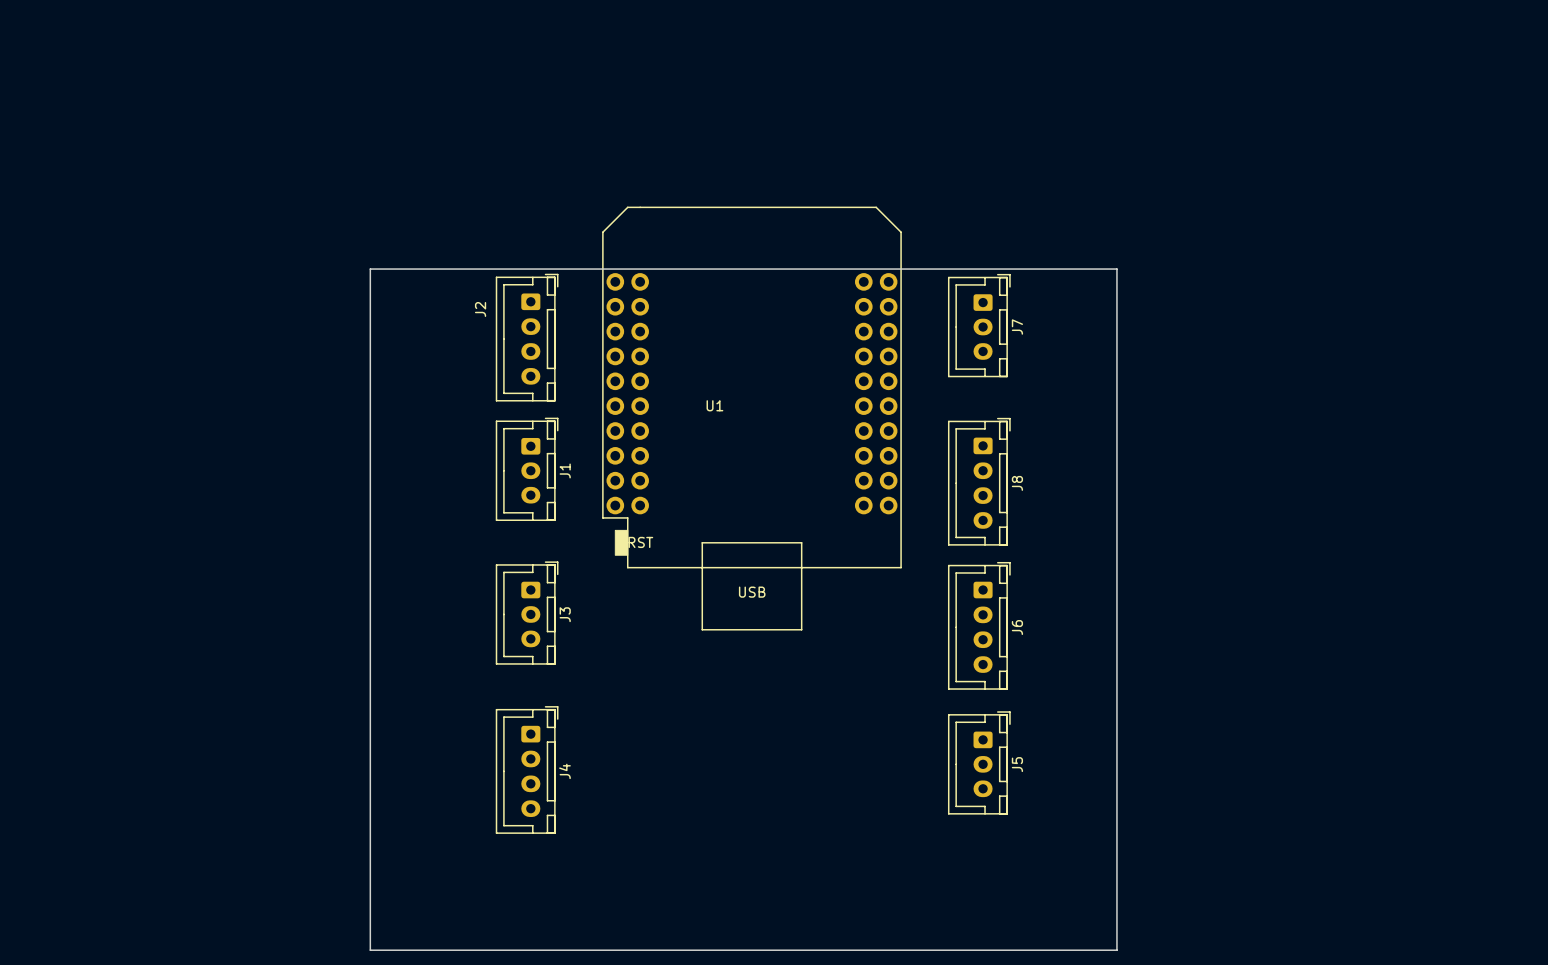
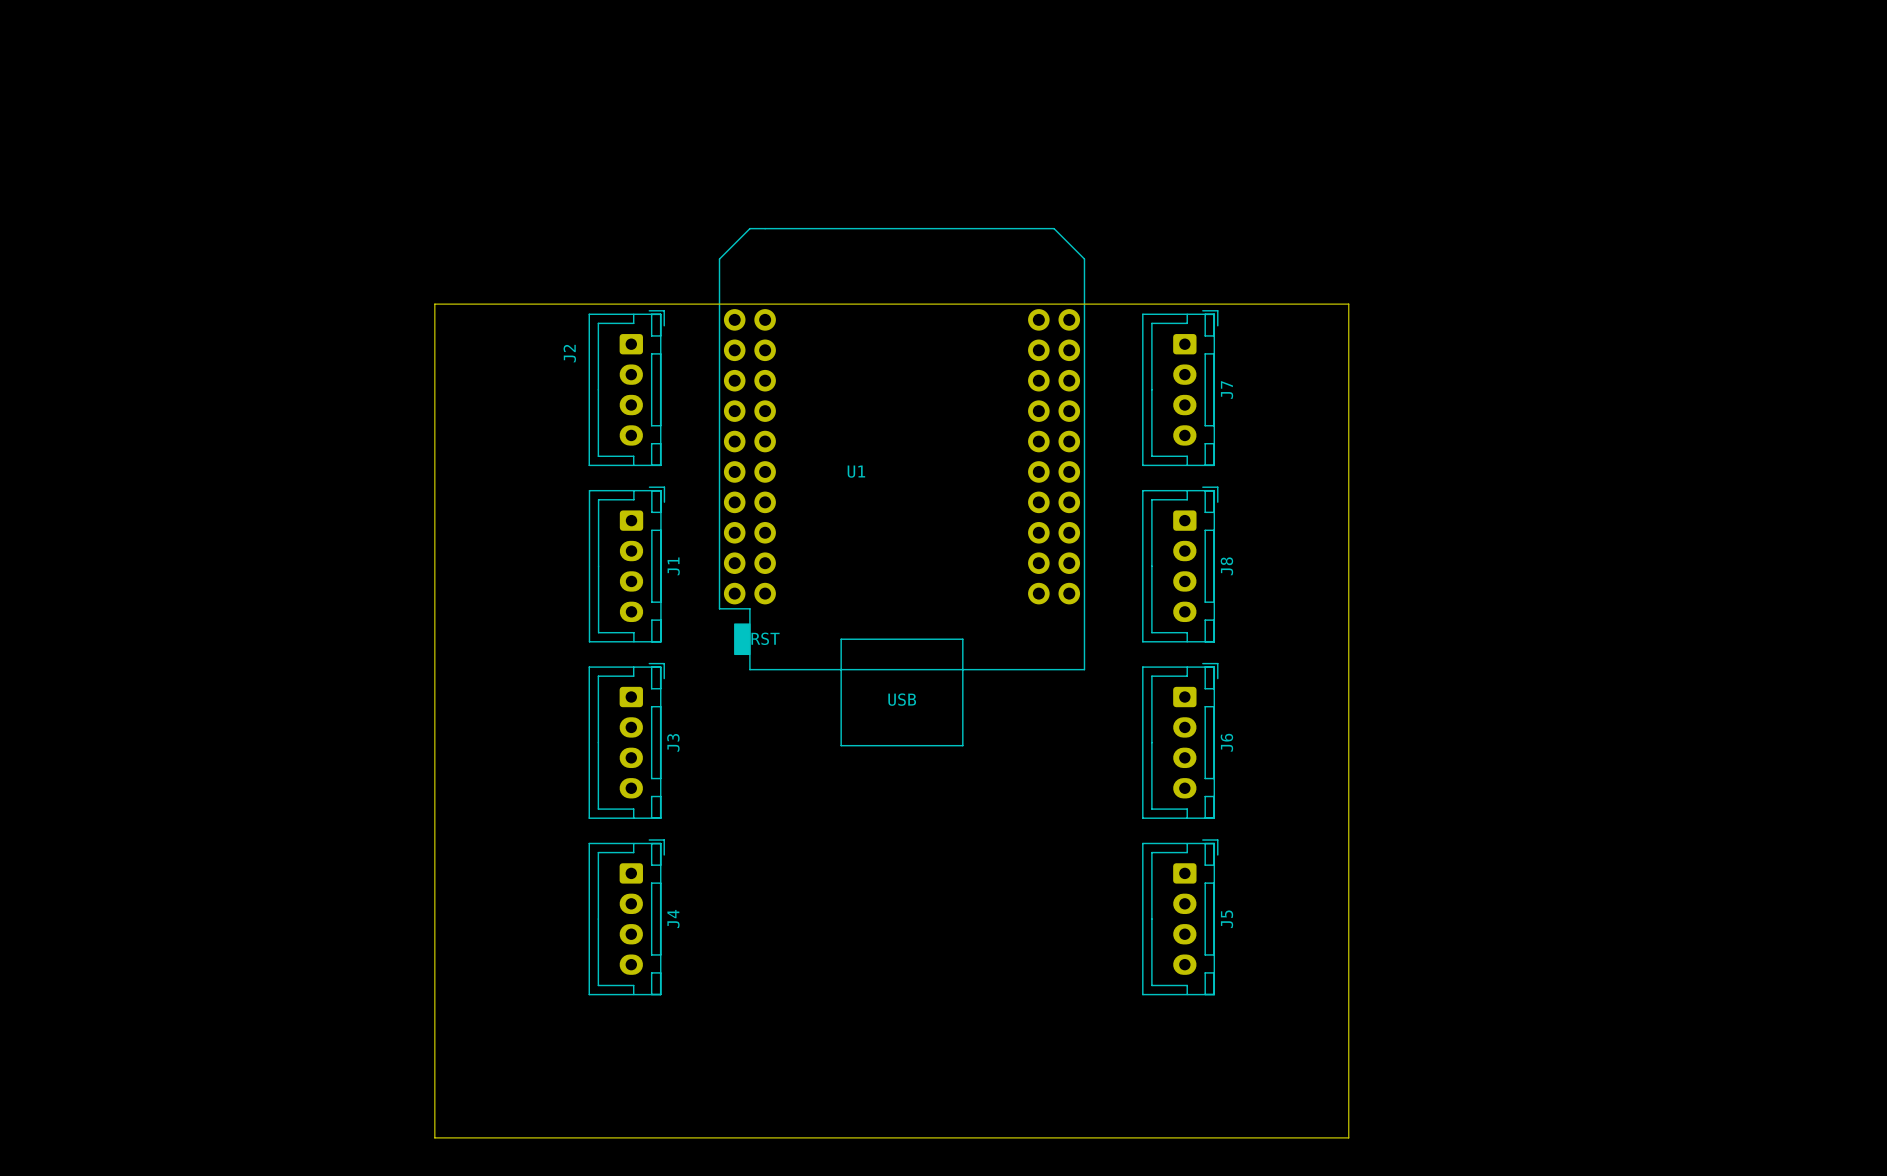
J7 footprint: [948, 274, 1011, 378] -> [1142, 310, 1219, 467]
J1 footprint: [495, 417, 559, 521] -> [588, 486, 666, 643]
J3 footprint: [495, 561, 559, 665] -> [588, 662, 665, 819]
J5 footprint: [948, 711, 1011, 815] -> [1142, 839, 1219, 996]

